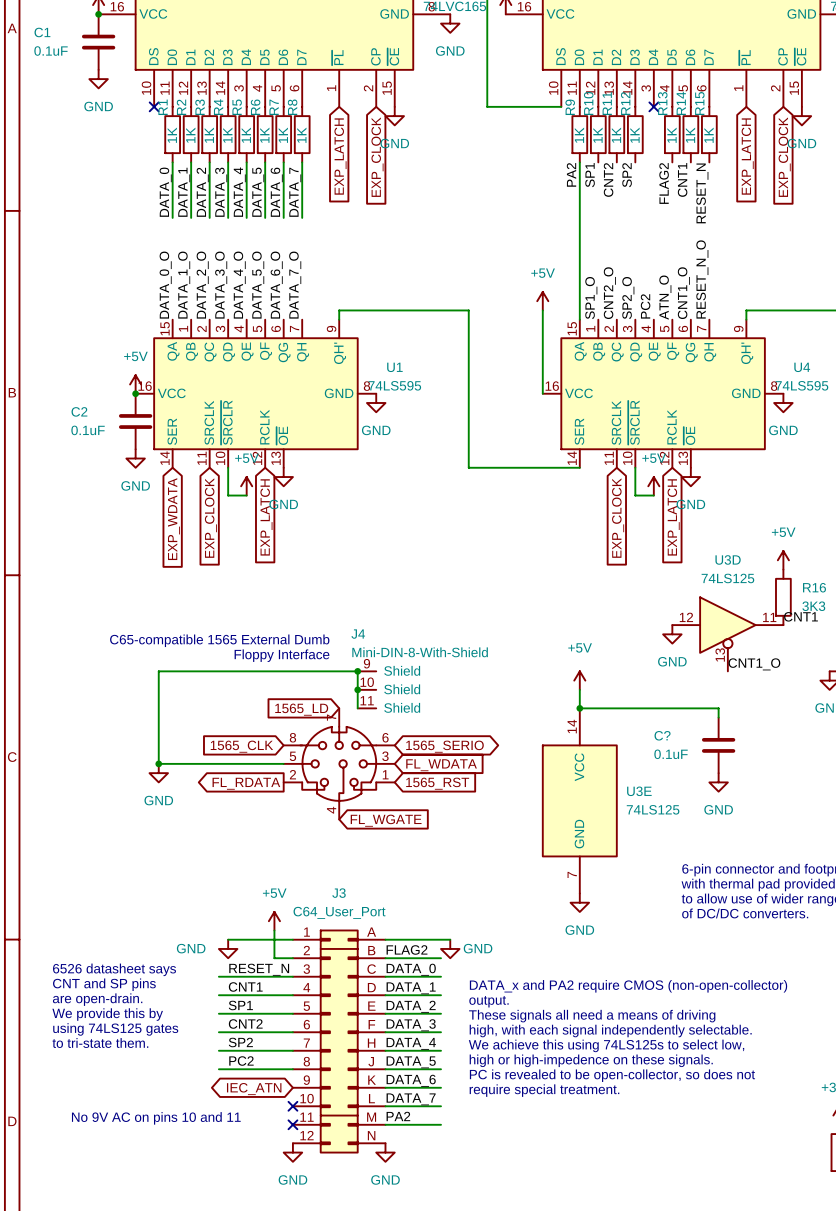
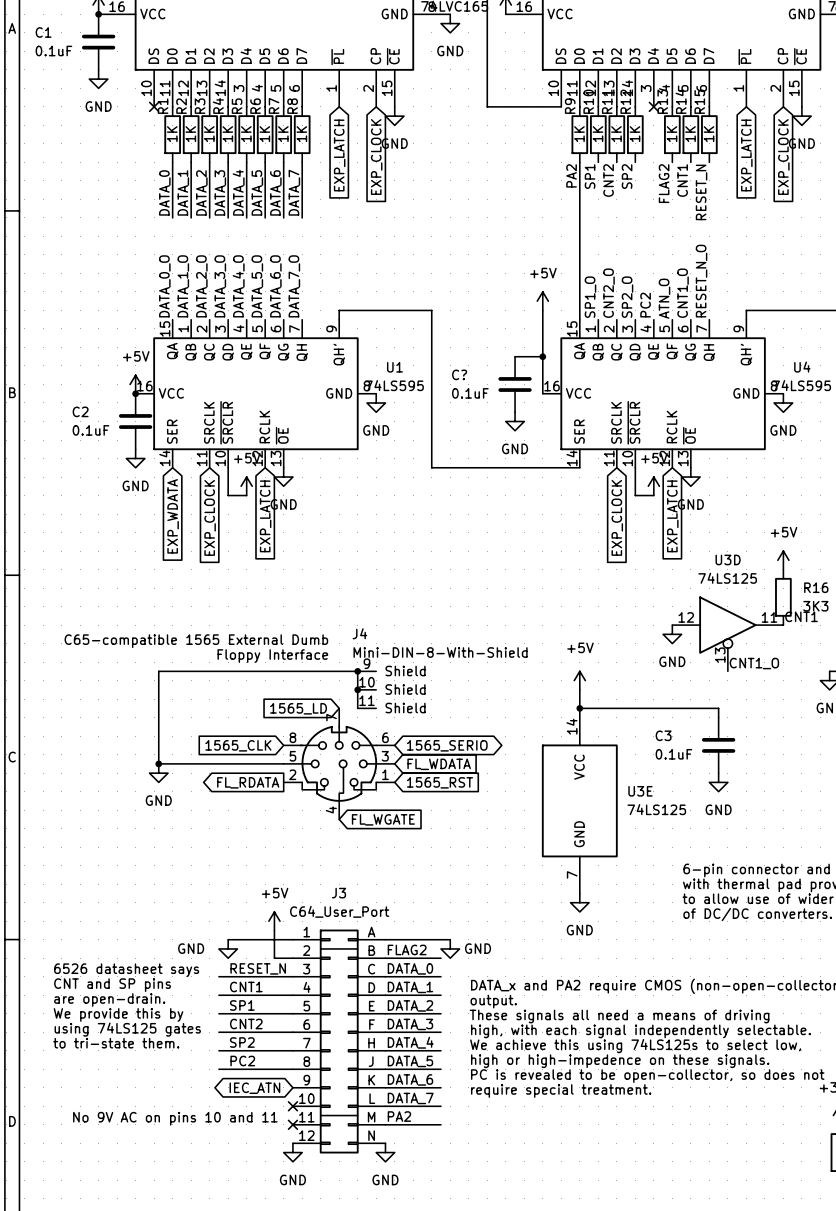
wire: (431, 310) (468, 310) (468, 467) -> (431, 310) (431, 467) (468, 467)
wire: none -> (515, 356) (542, 356)
junction: none -> (542, 356)
C?: none -> 0.1uF (515, 384)
power symbol: none -> GND (515, 421)
C? name: C? (662, 735) -> C3 (663, 735)

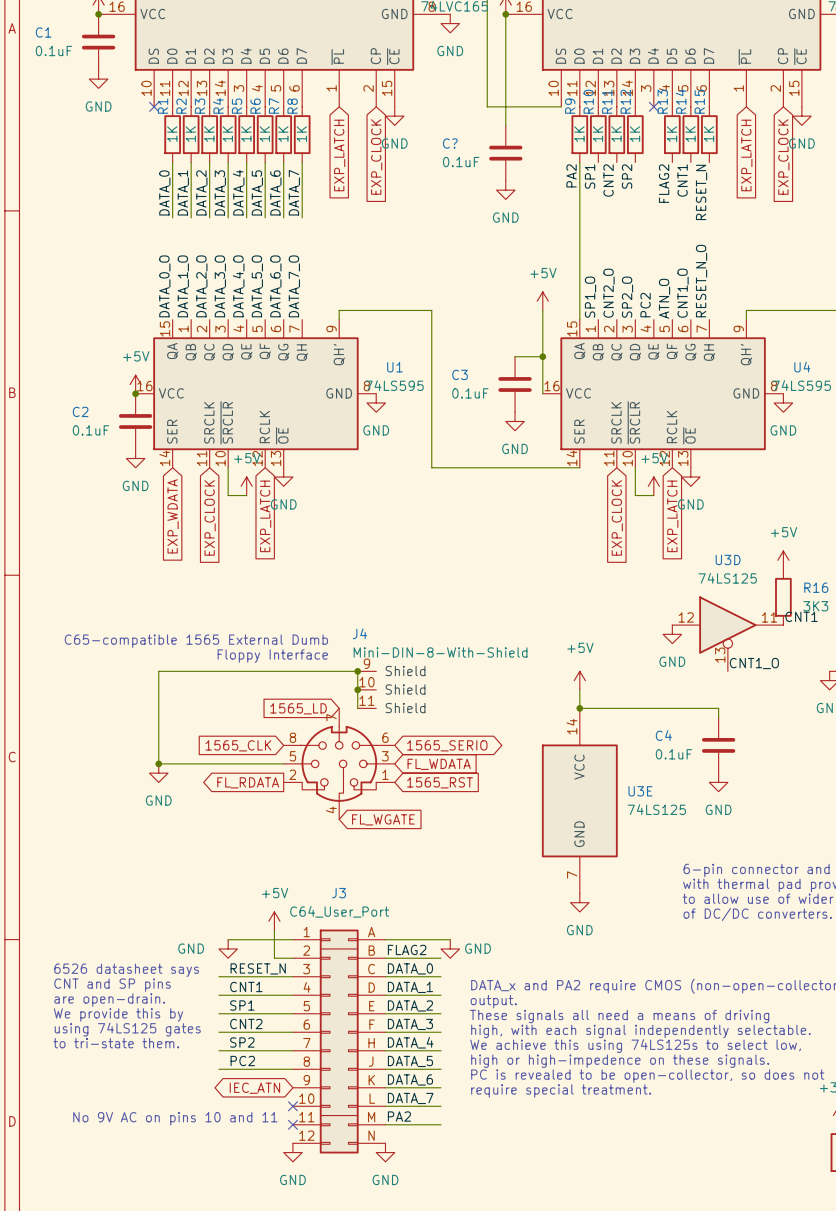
wire: none -> (505, 14) (505, 125)
junction: none -> (505, 14)
C?: none -> 0.1uF (505, 153)
power symbol: none -> GND (505, 190)
C? name: C? (459, 374) -> C3 (460, 374)
C3 name: C3 (663, 735) -> C4 (663, 735)

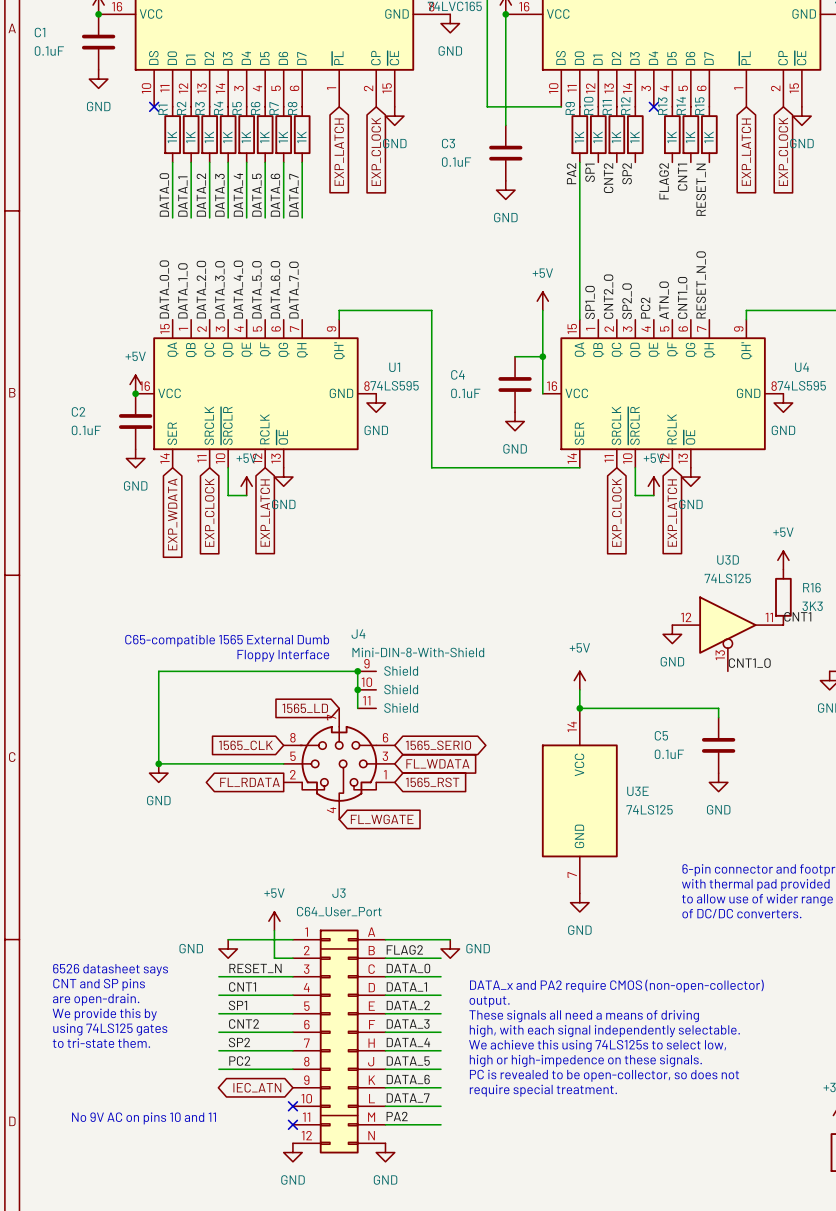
C? name: C? (450, 143) -> C3 (448, 143)
C3 name: C3 (460, 374) -> C4 (457, 374)
C4 name: C4 (663, 735) -> C5 (661, 735)

